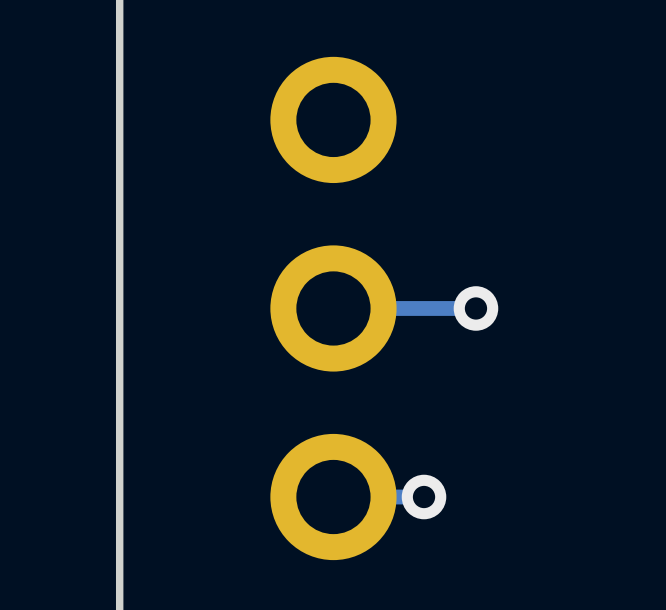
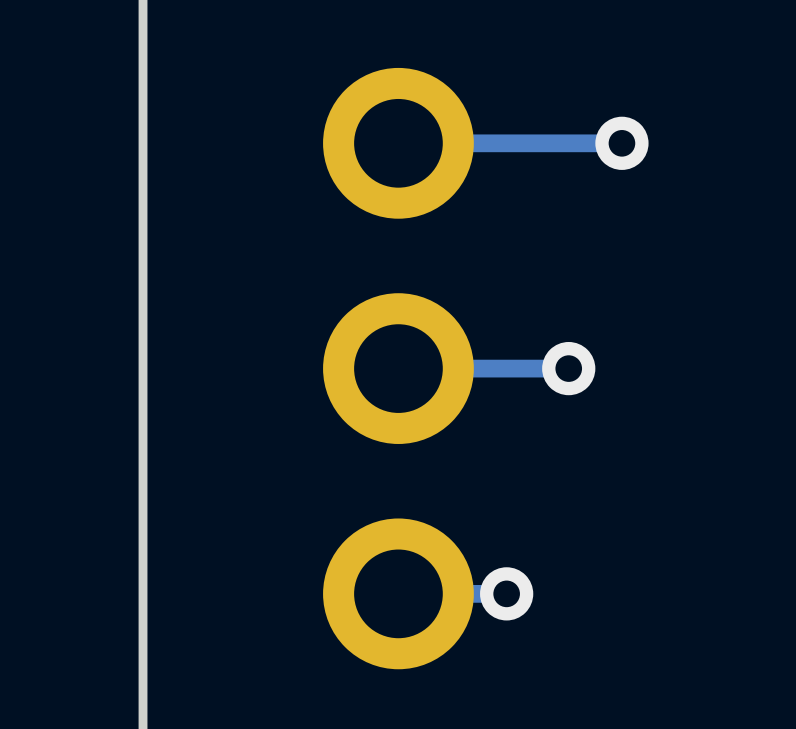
track: none -> (621, 143) (398, 143)
via: none -> (621, 143)

